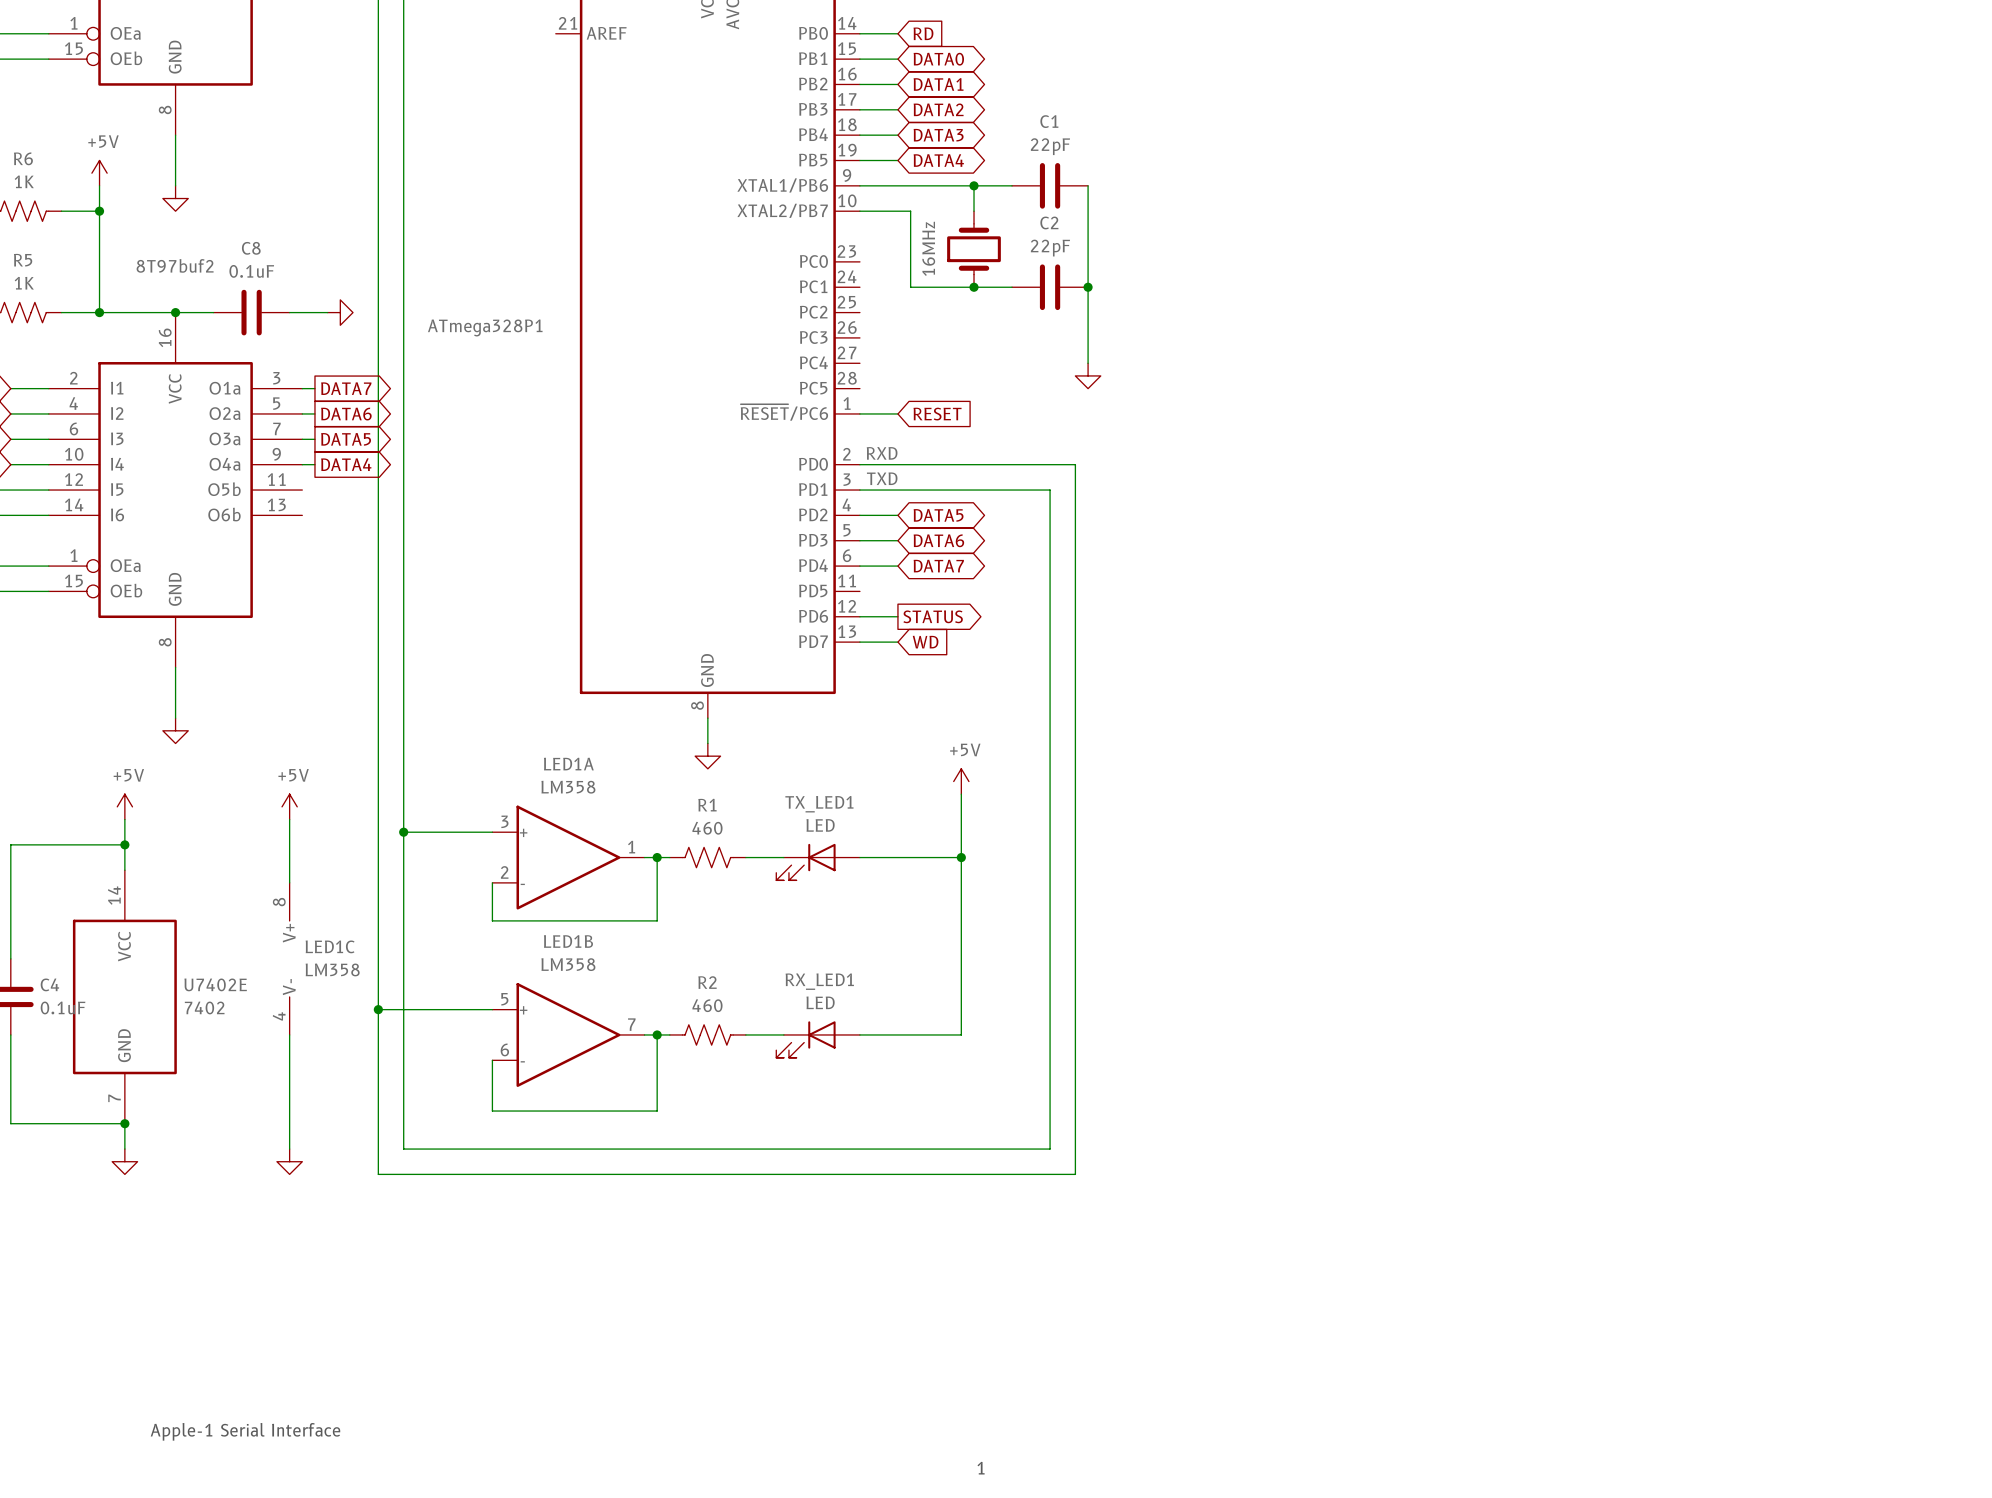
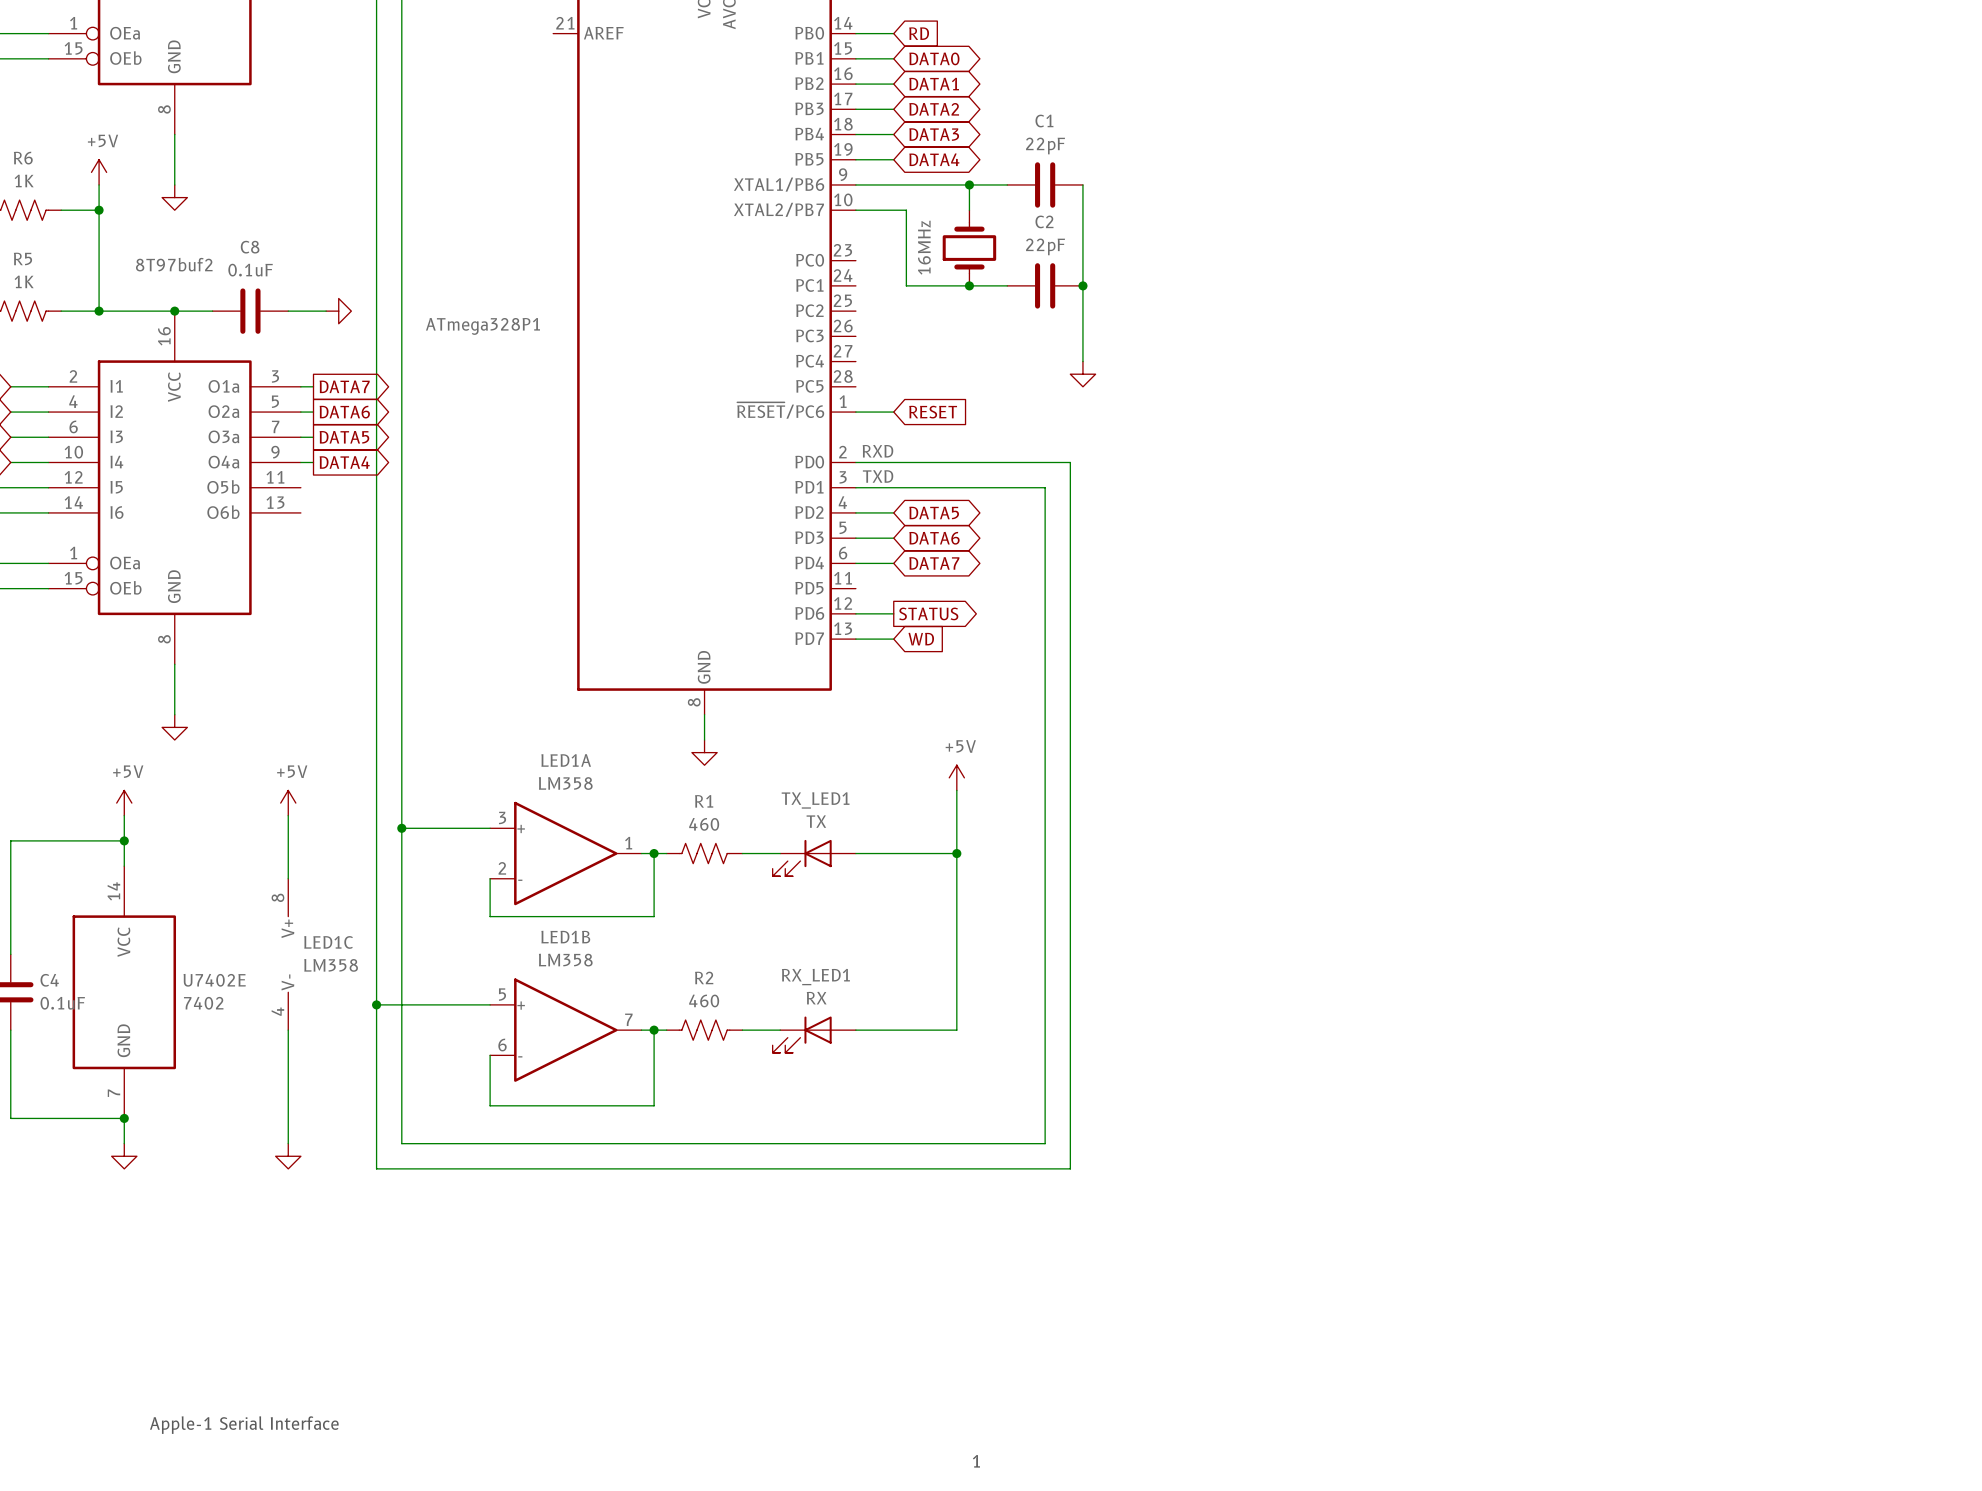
TX_LED1 value: LED (820, 825) -> TX (816, 821)
RX_LED1 value: LED (820, 1002) -> RX (816, 998)

